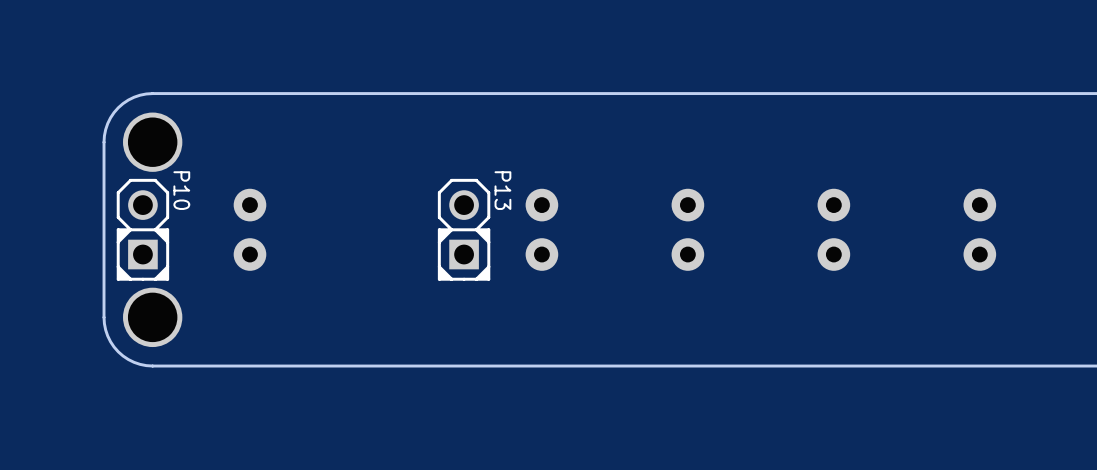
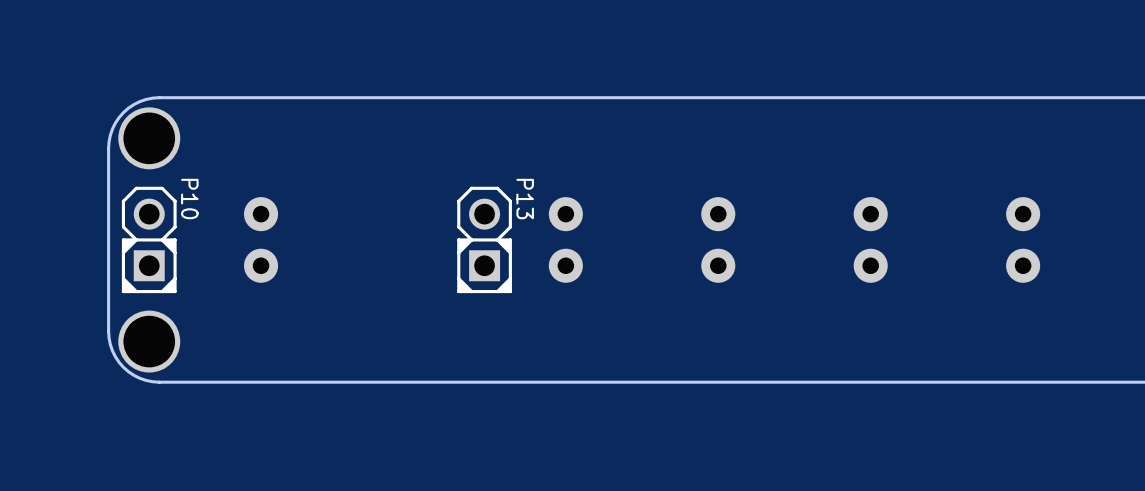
part position: (152, 142) -> (149, 138)
part position: (152, 317) -> (149, 341)

